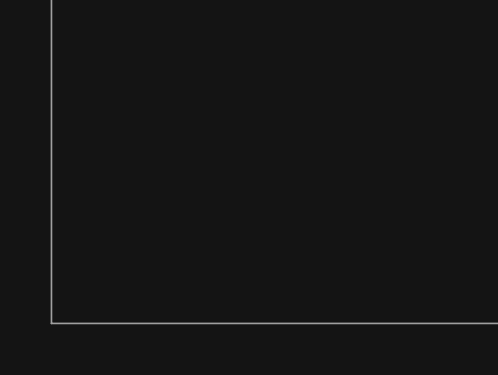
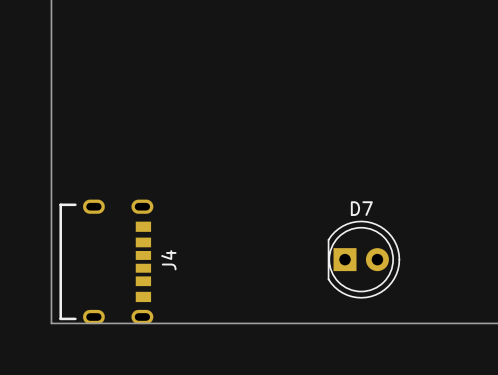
D7: none -> (363, 259)
J4: none -> (106, 261)

